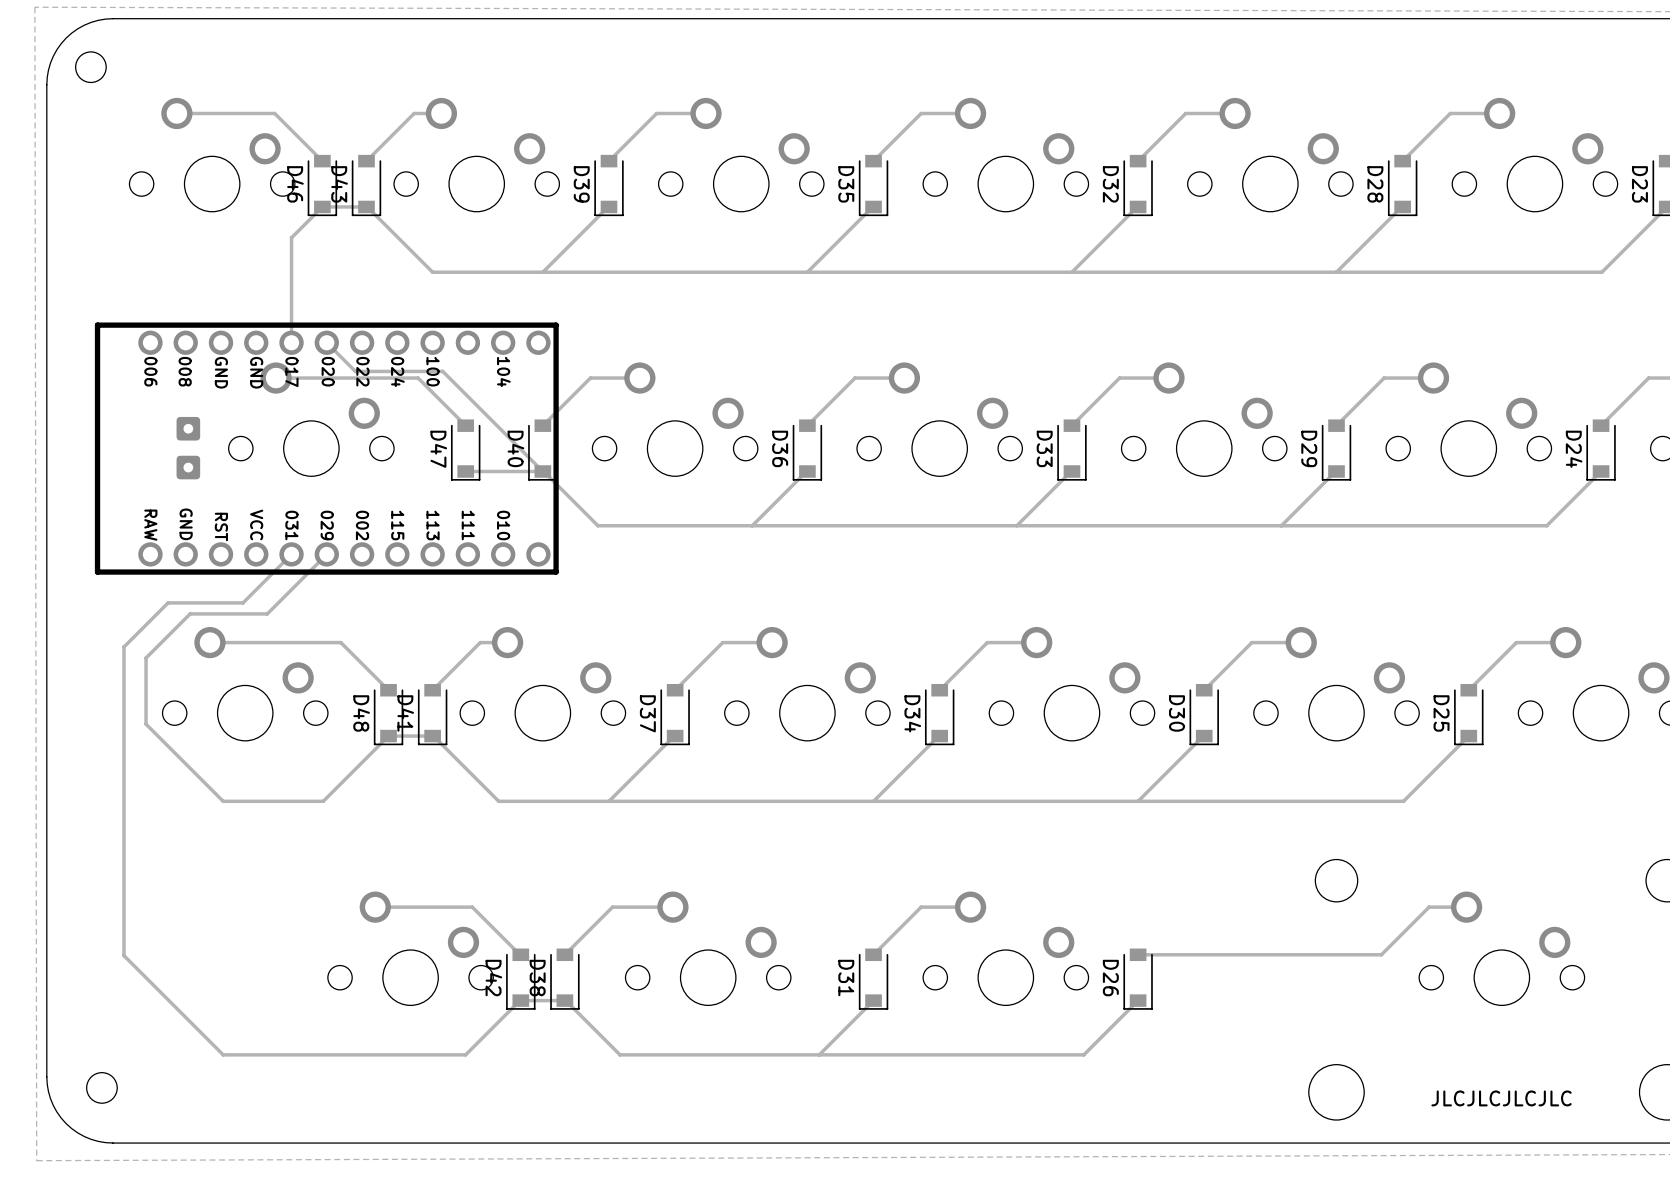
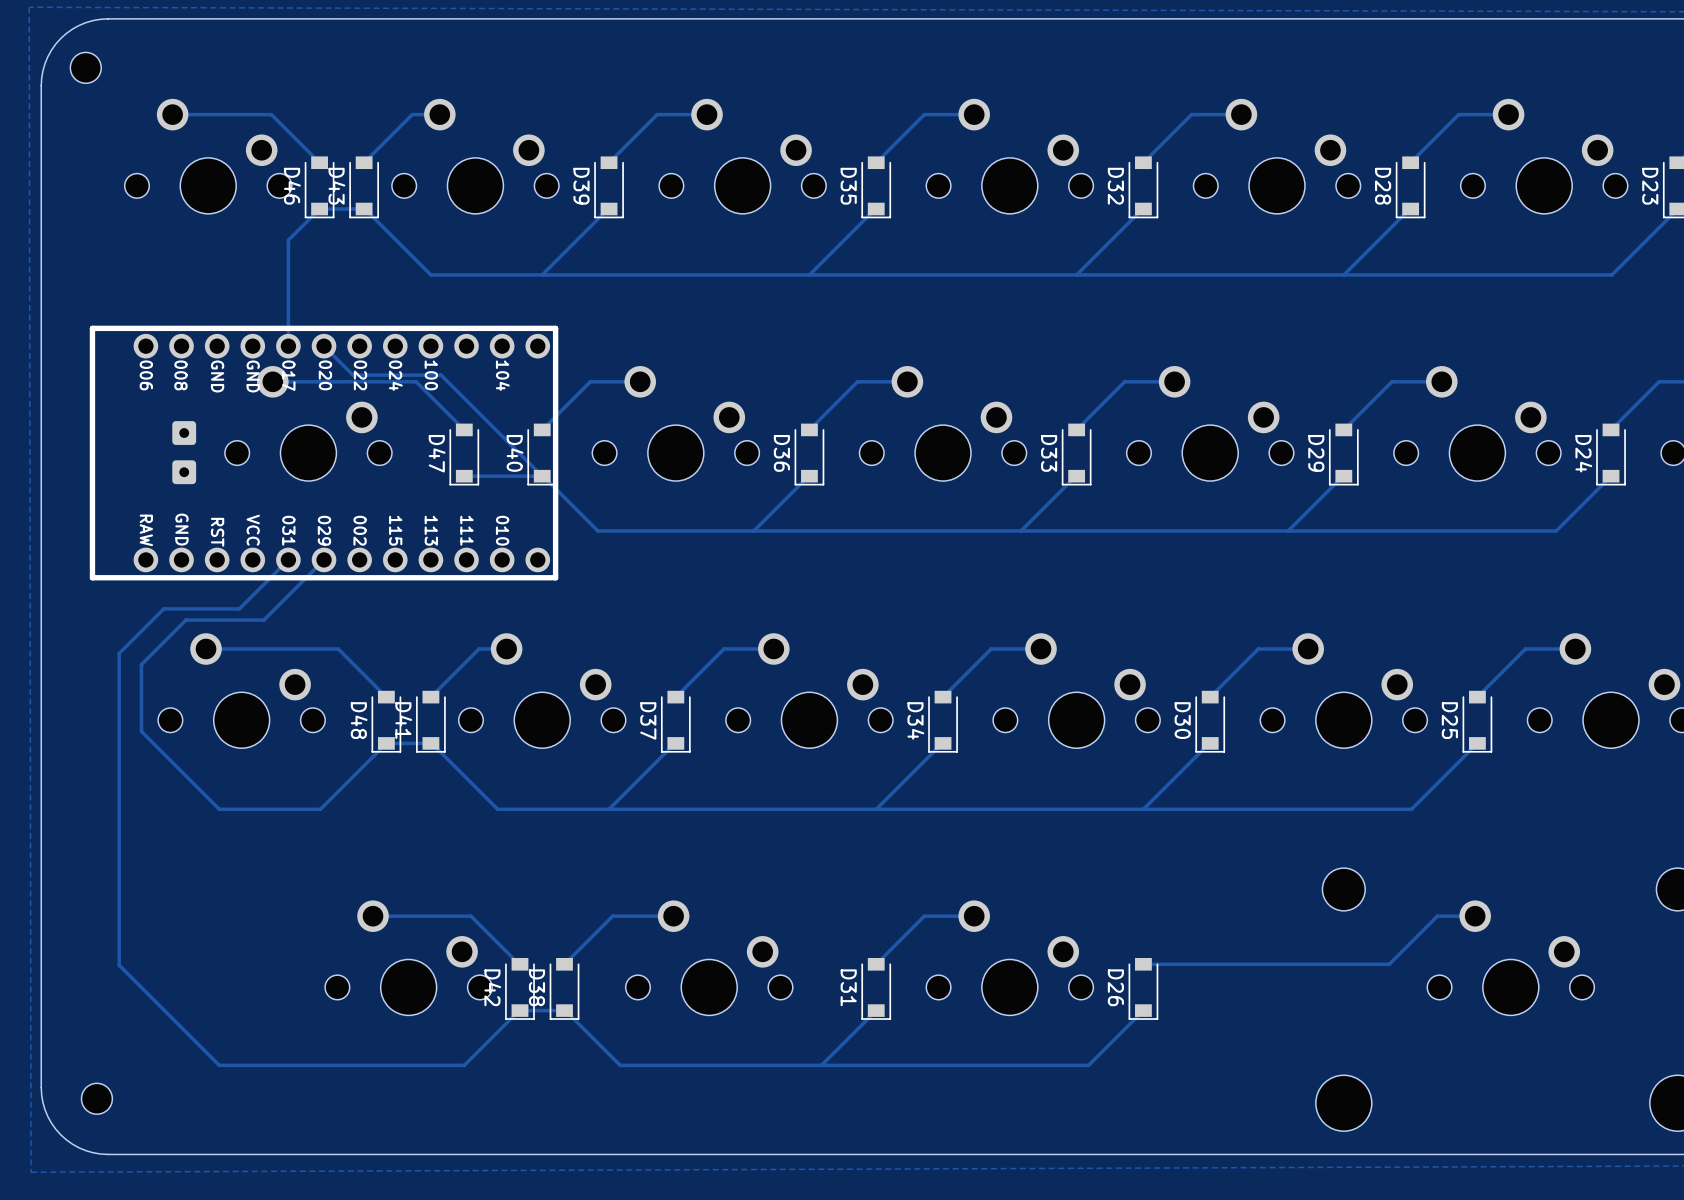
text: JLCJLCJLCJLC (1501, 1098) -> none

